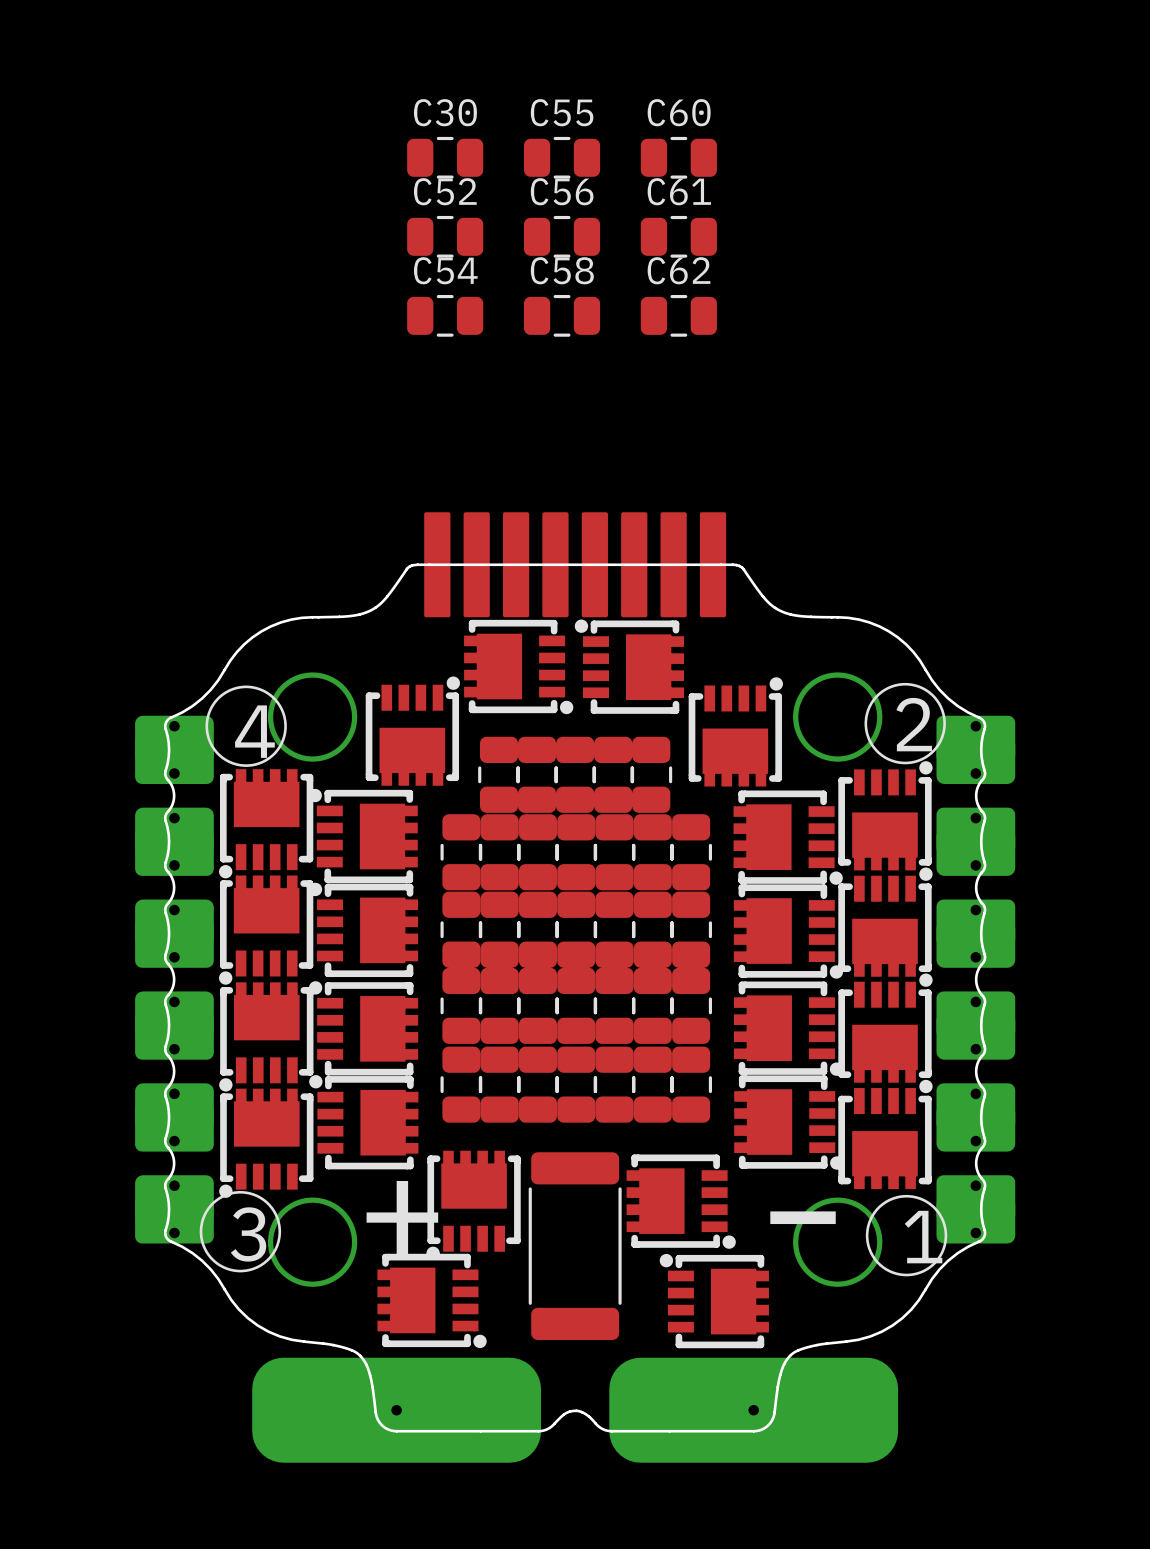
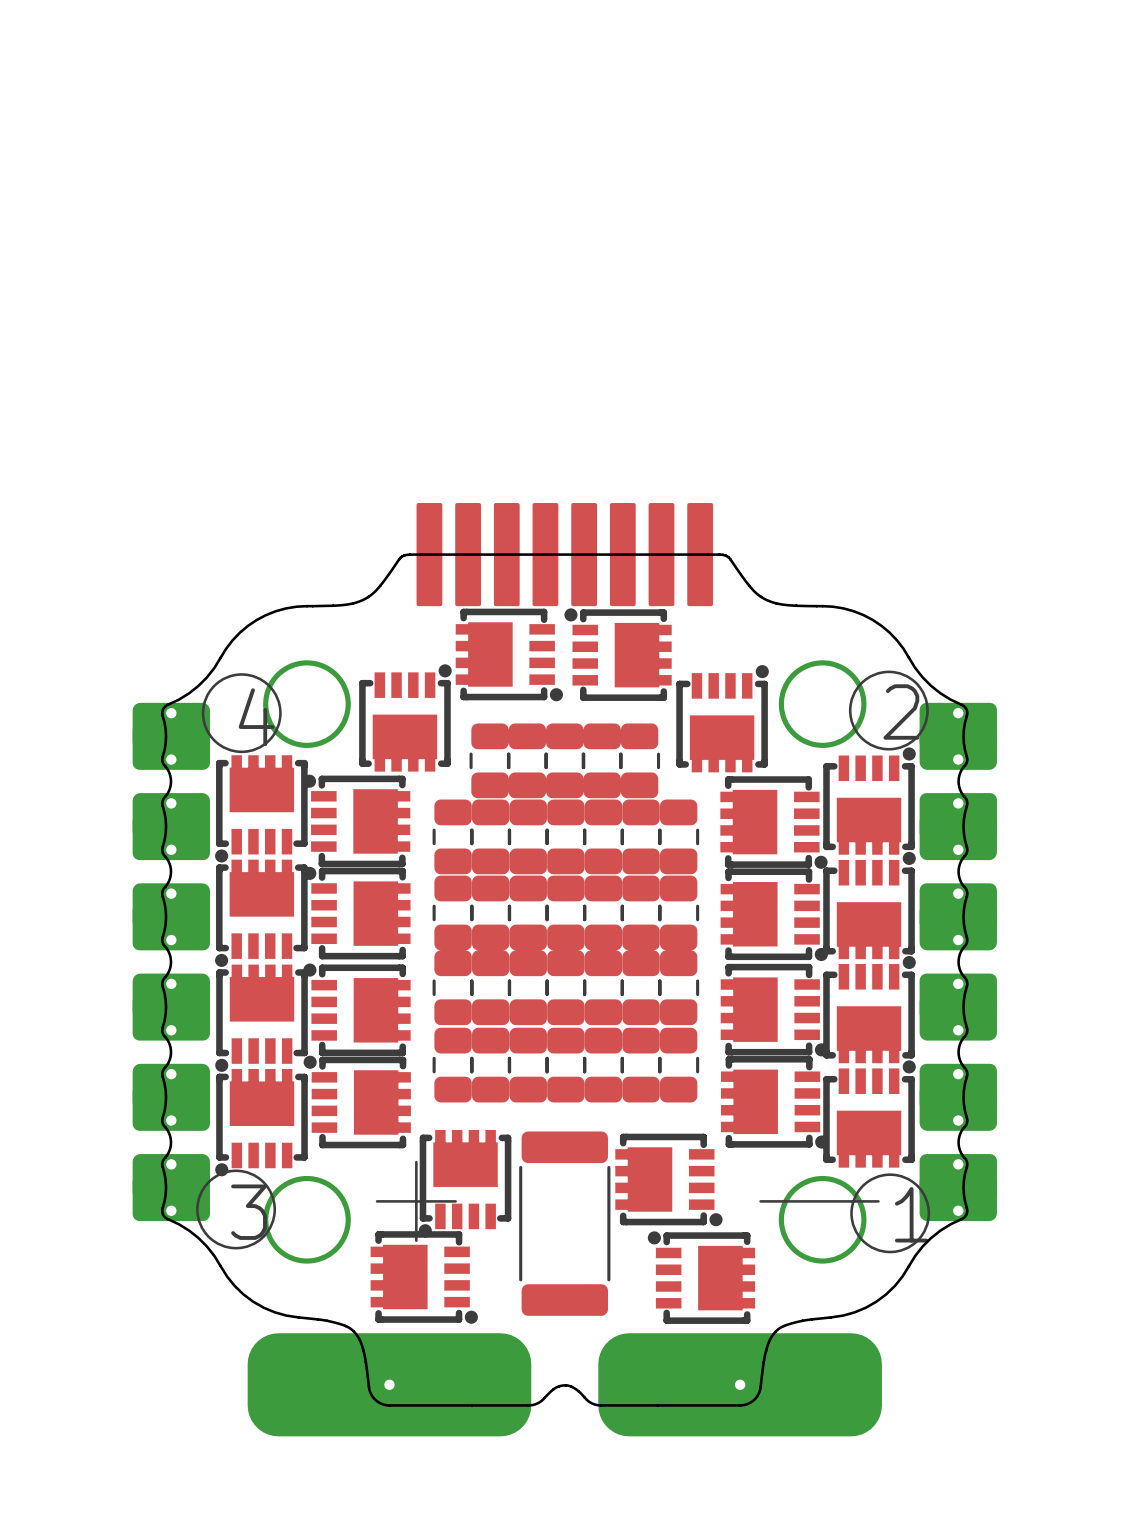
C30: (445, 157) -> none
C55: (562, 157) -> none
C60: (678, 157) -> none
C52: (445, 236) -> none
C56: (562, 236) -> none
C61: (678, 236) -> none
C54: (445, 315) -> none
C58: (562, 315) -> none
C62: (678, 315) -> none

